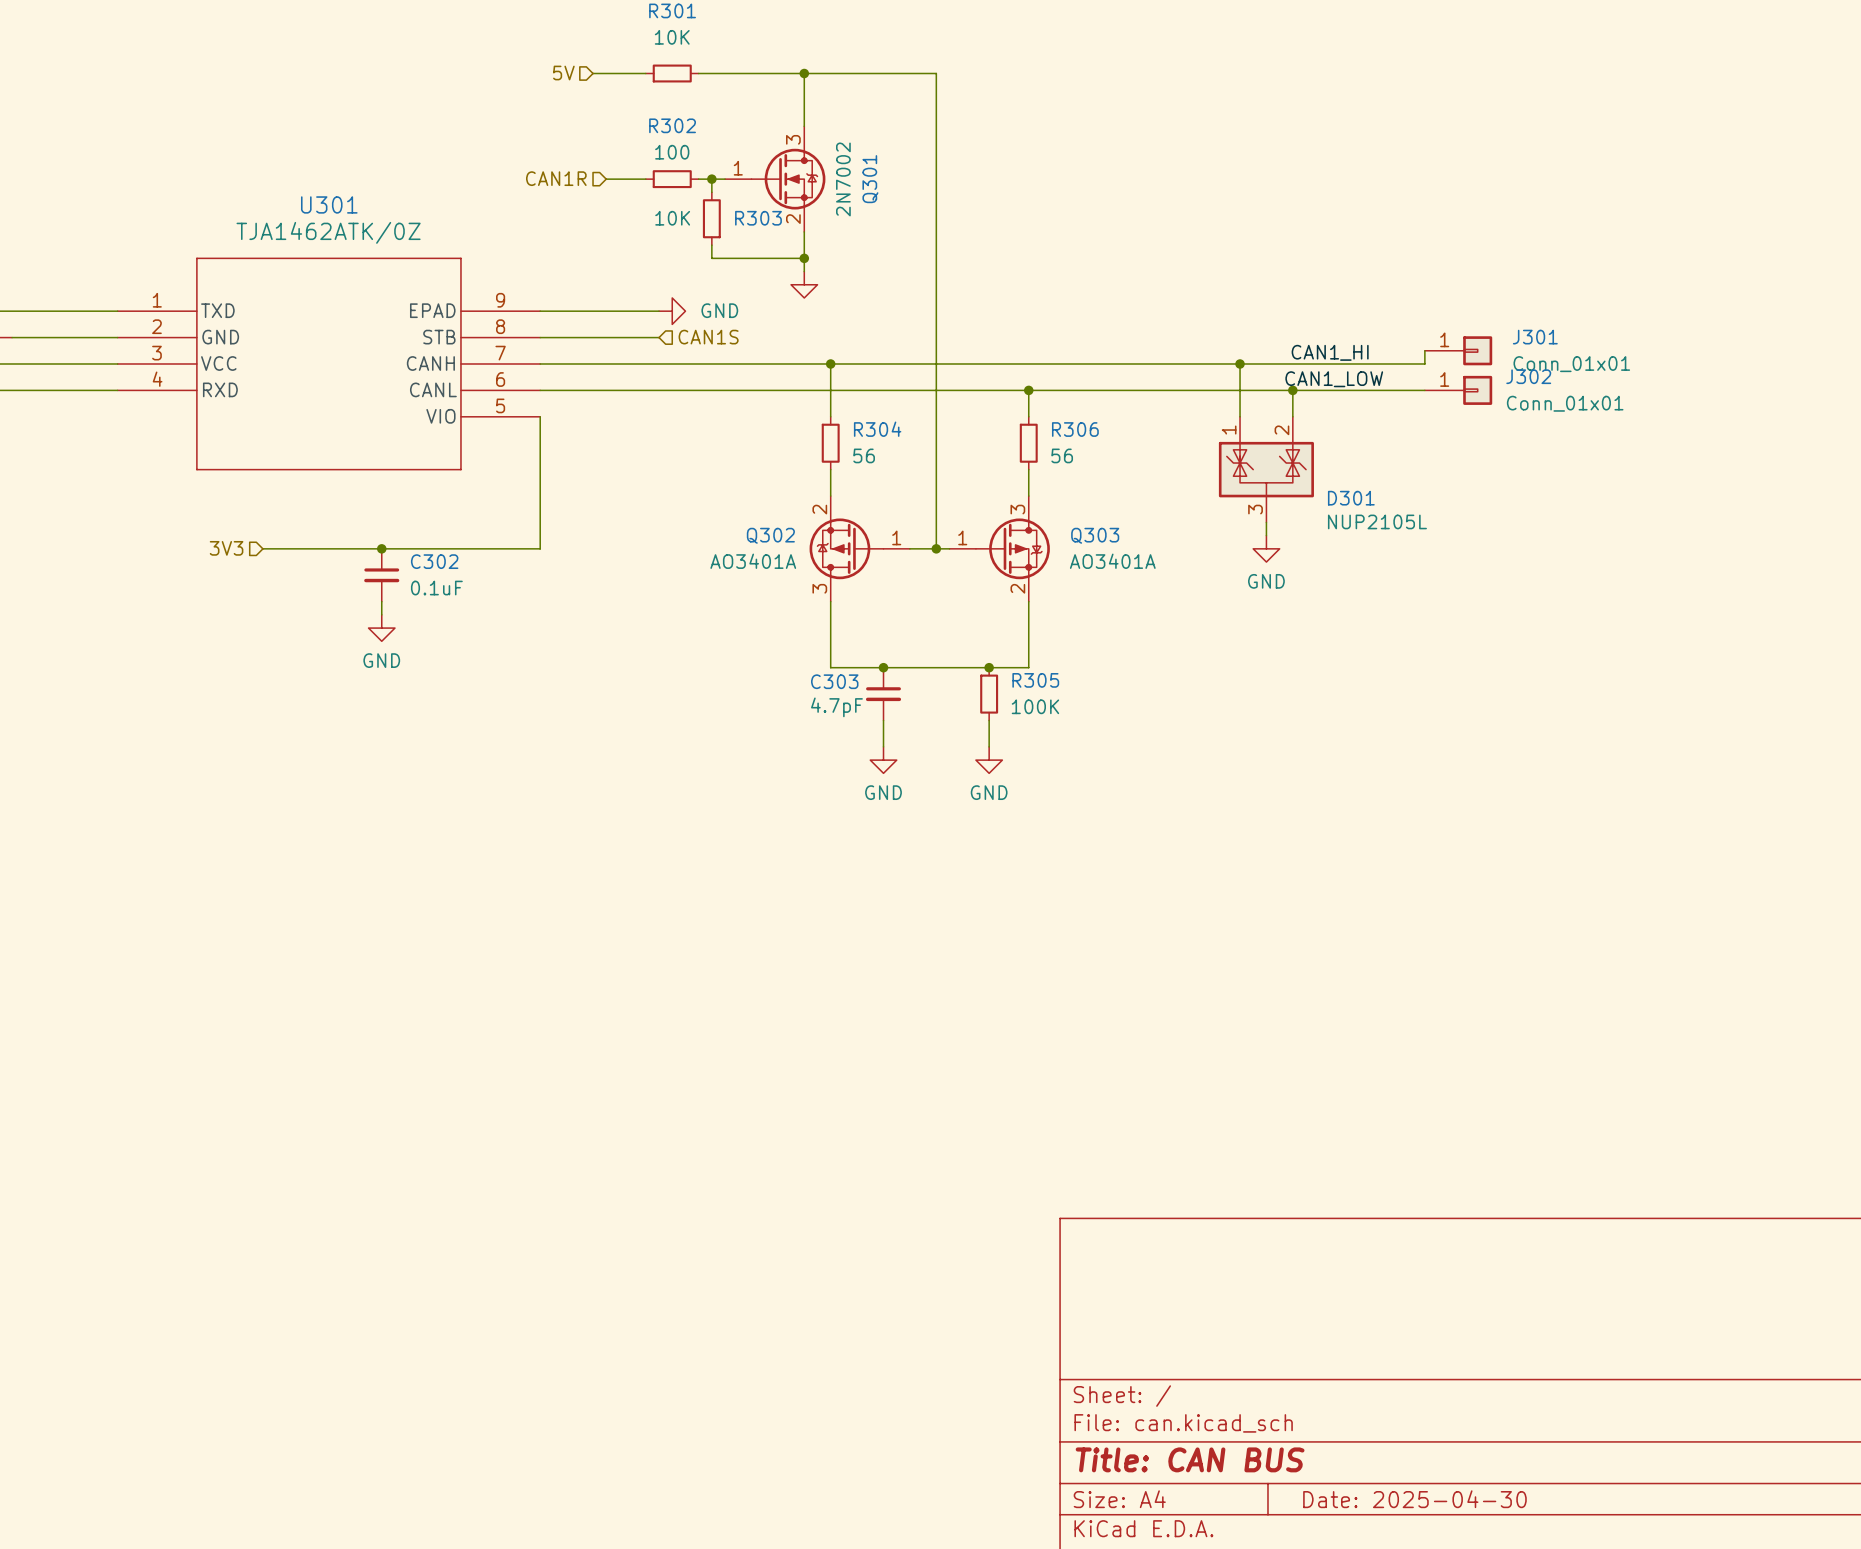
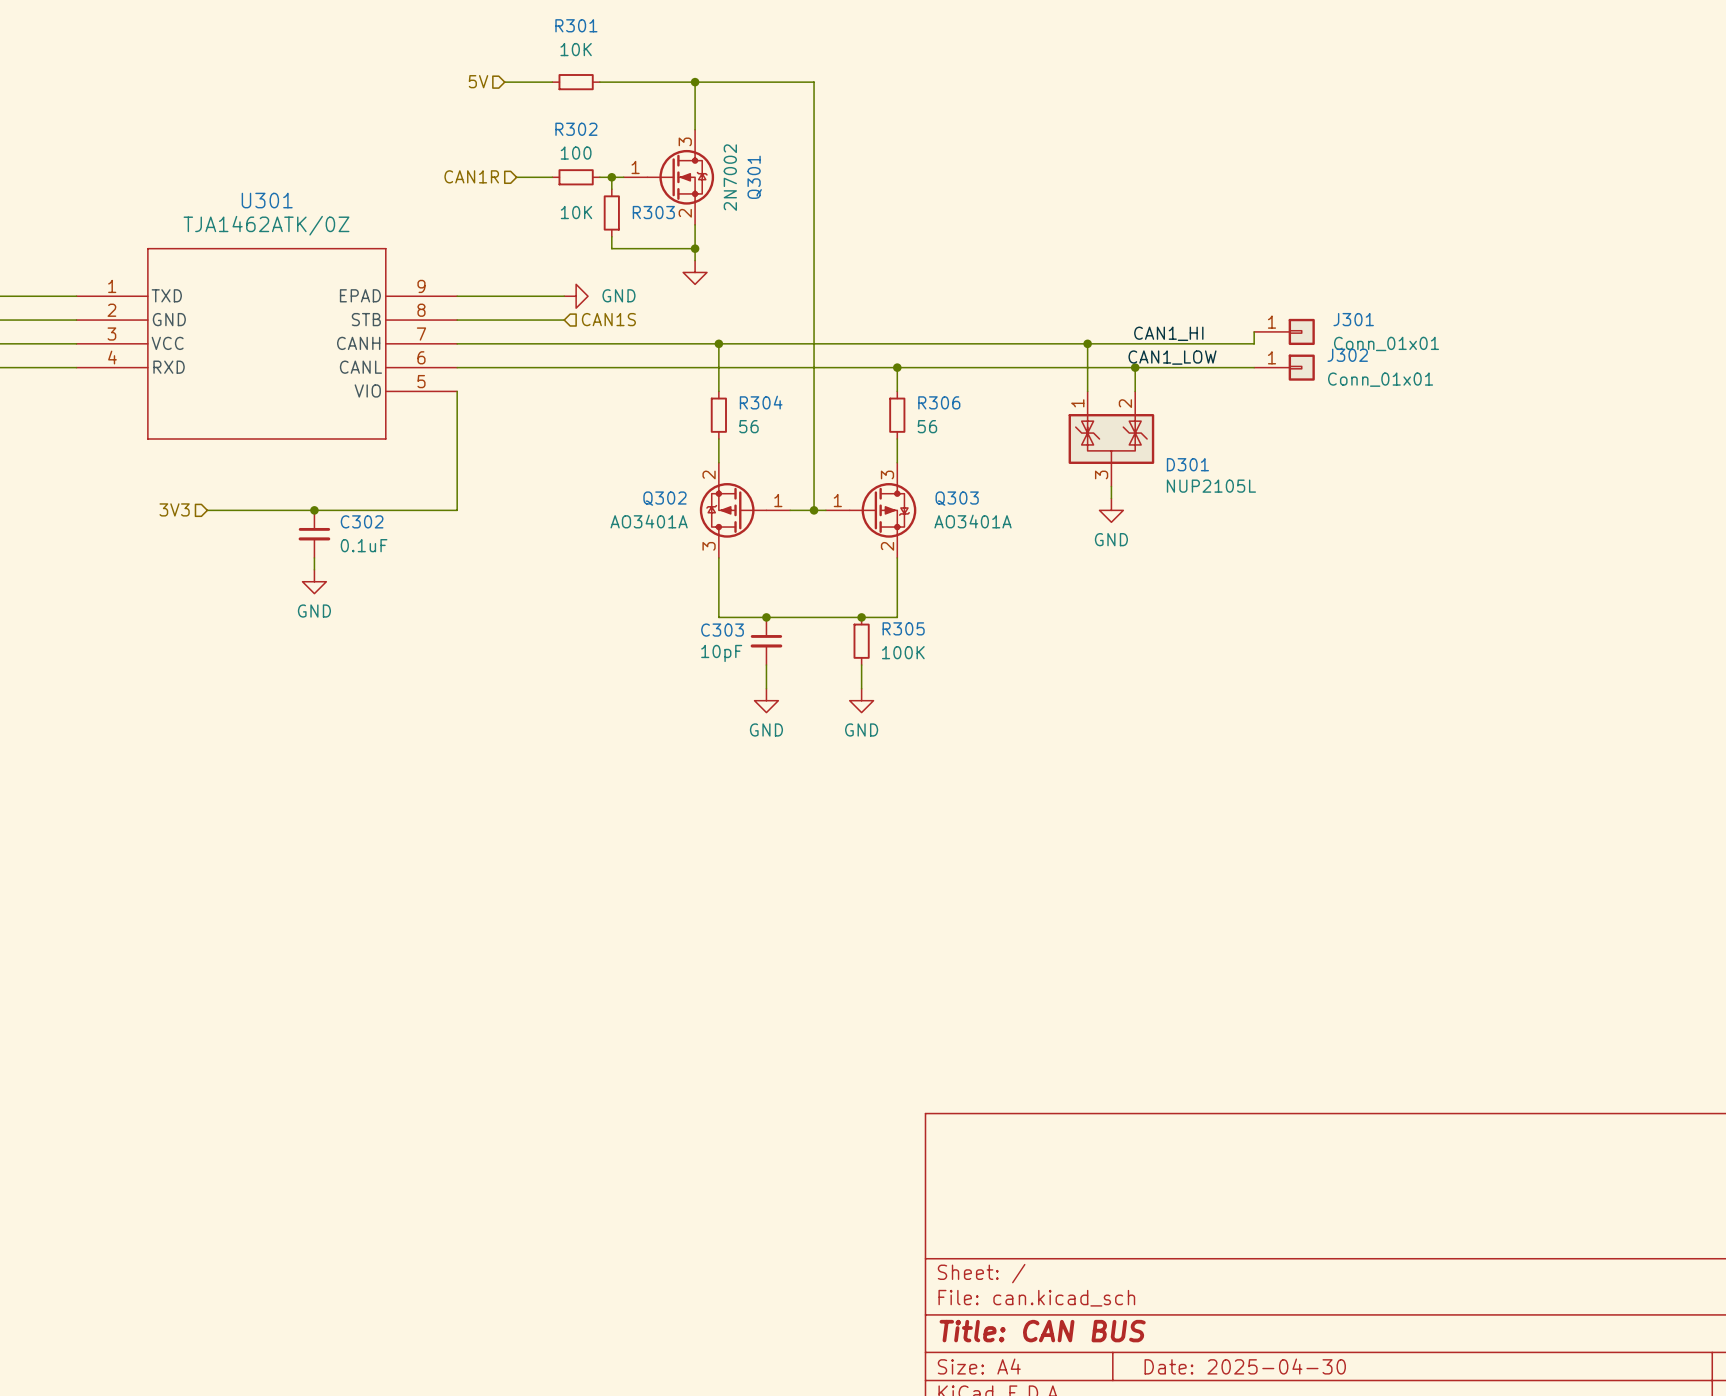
C303 value: 4.7pF (836, 707) -> 10pF (721, 653)

